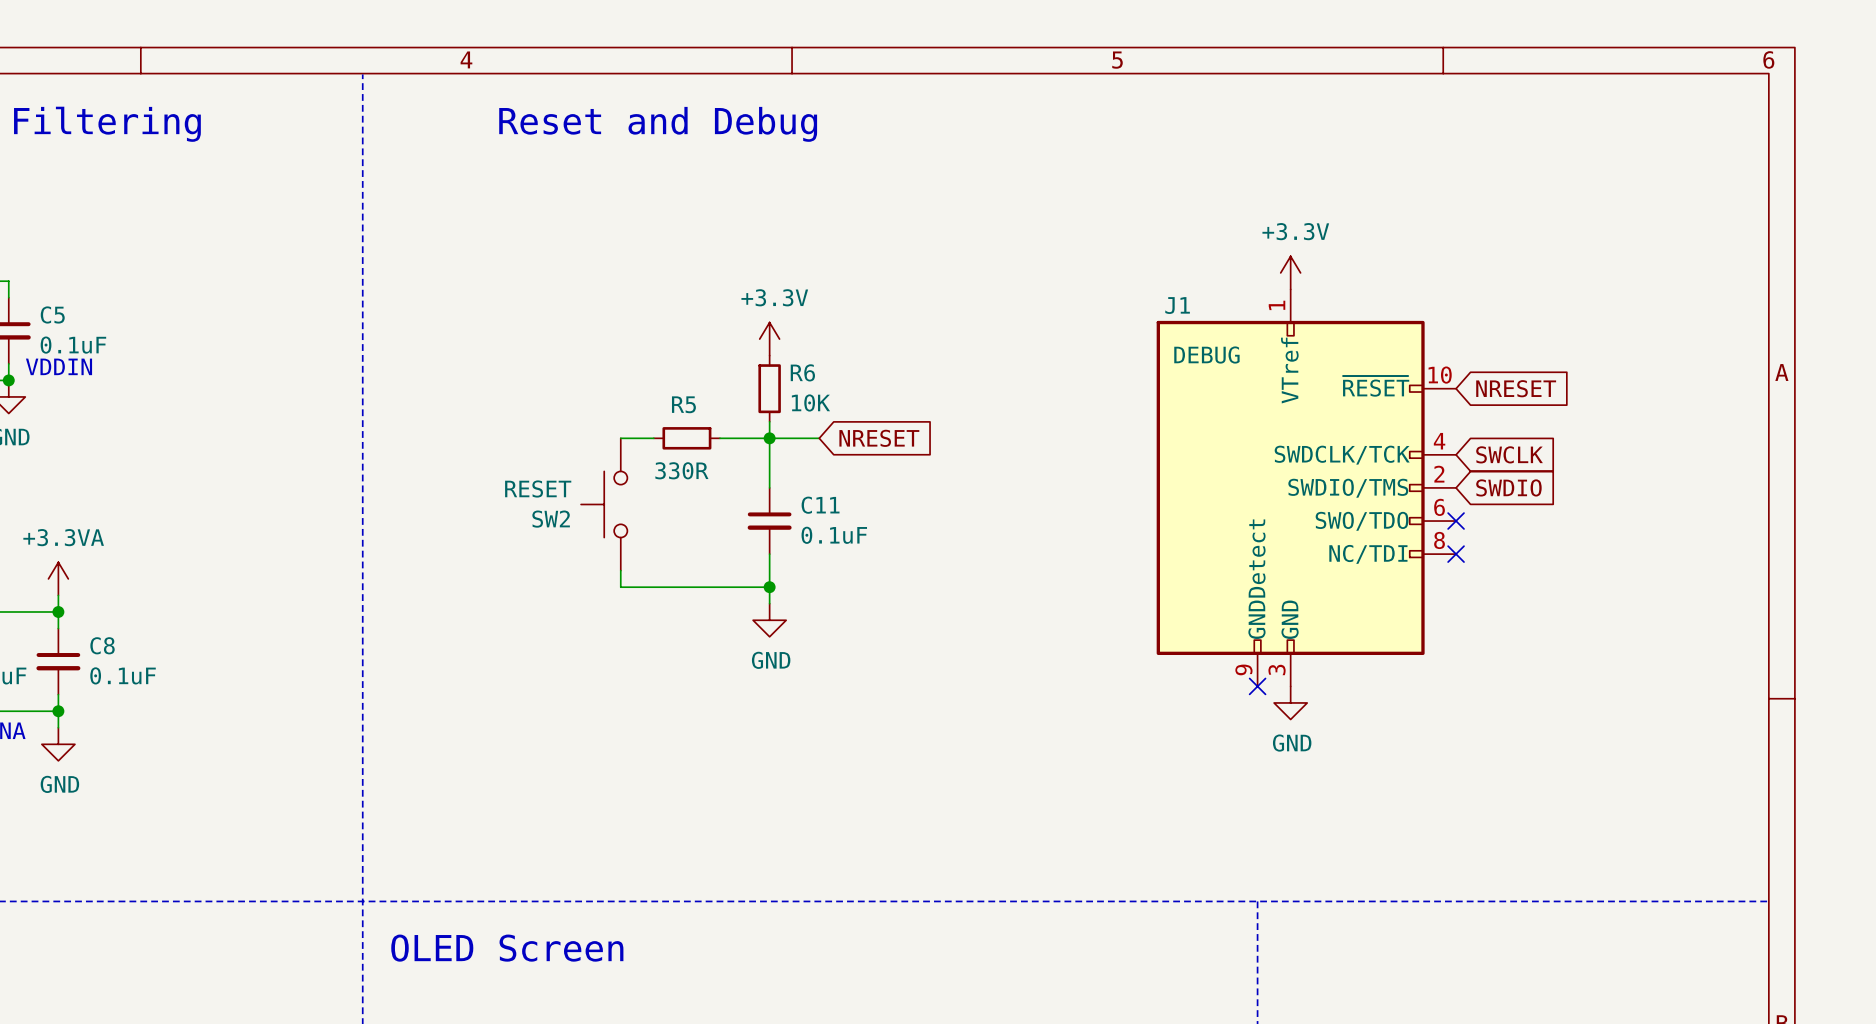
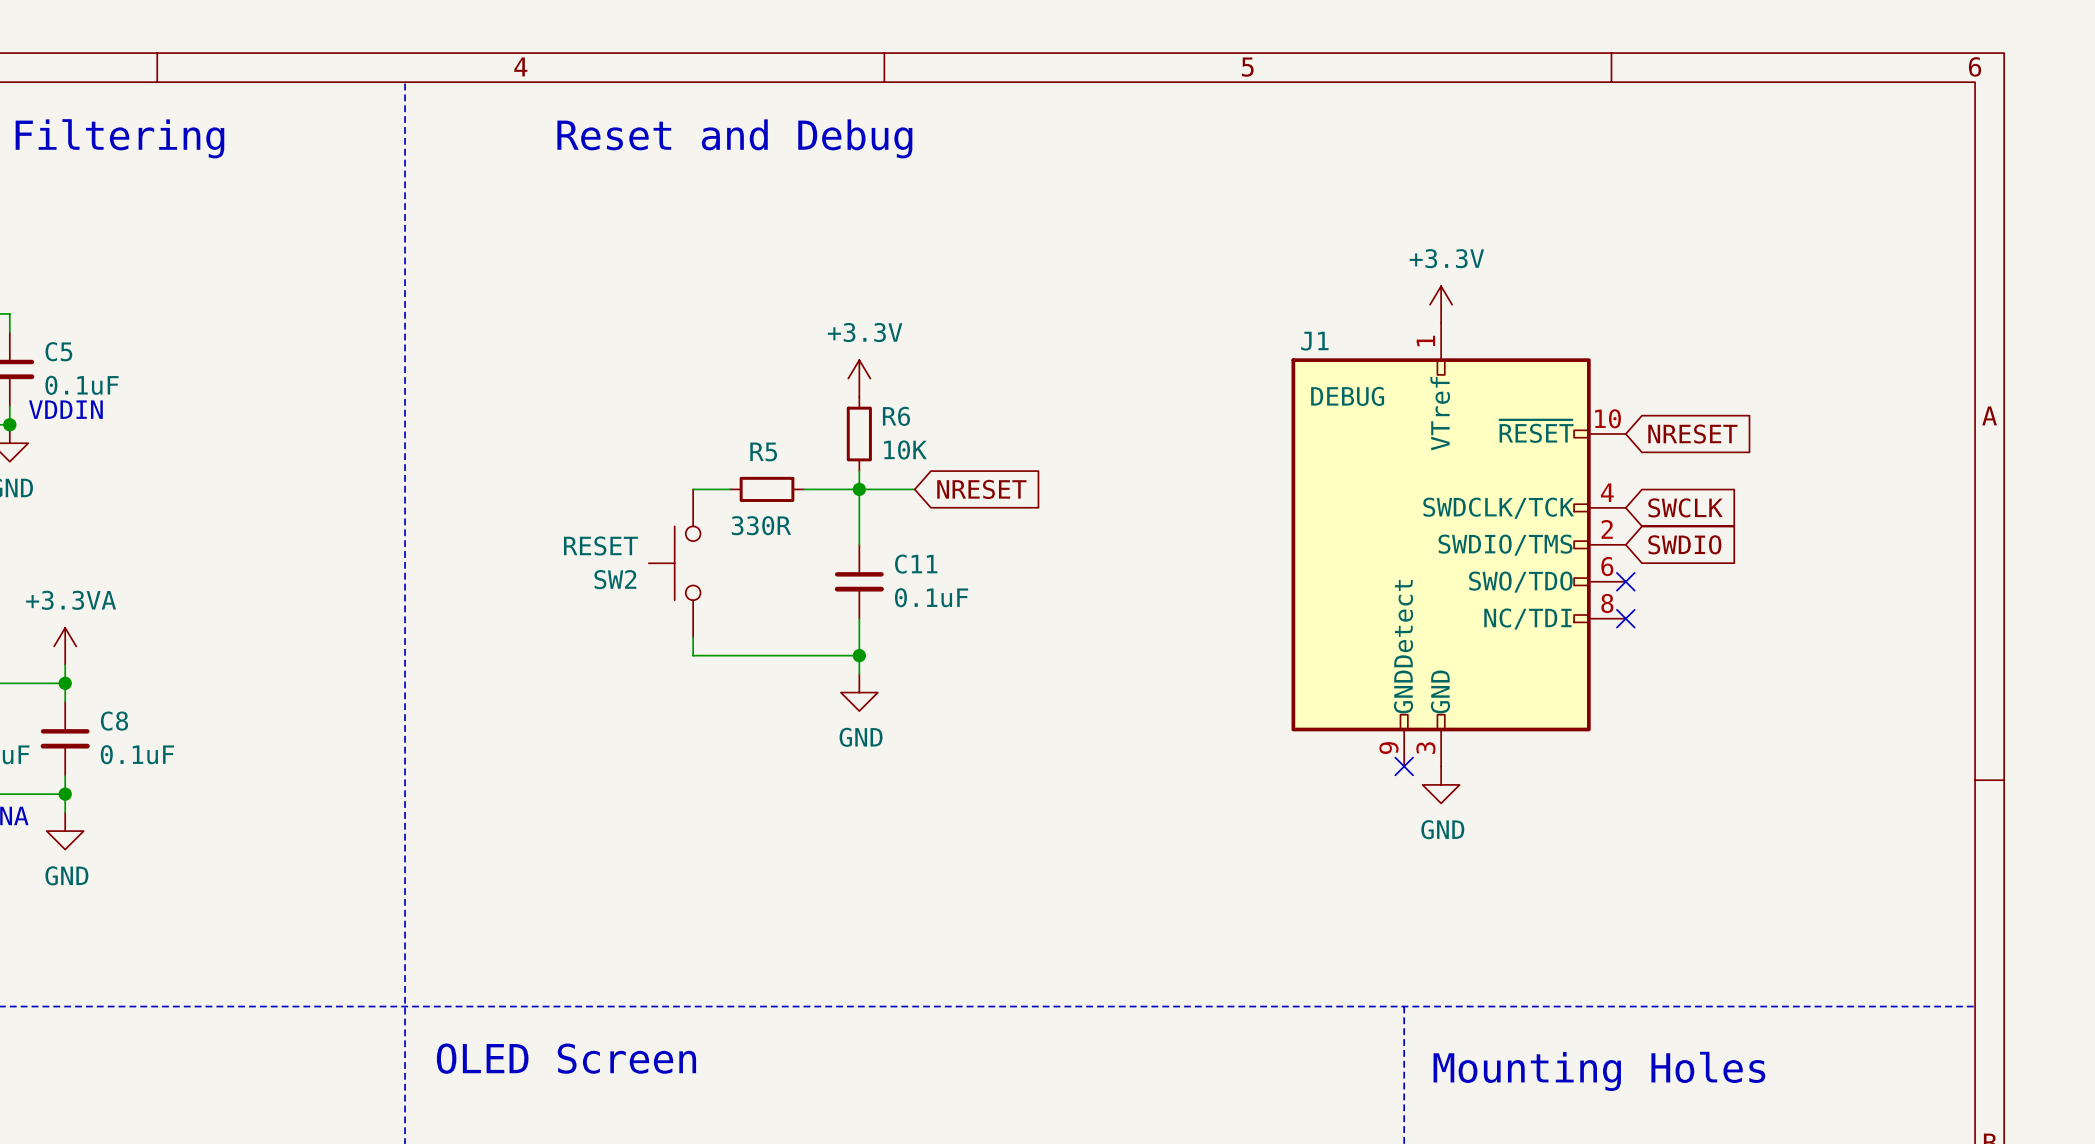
text: none -> Mounting Holes (1599, 1071)

